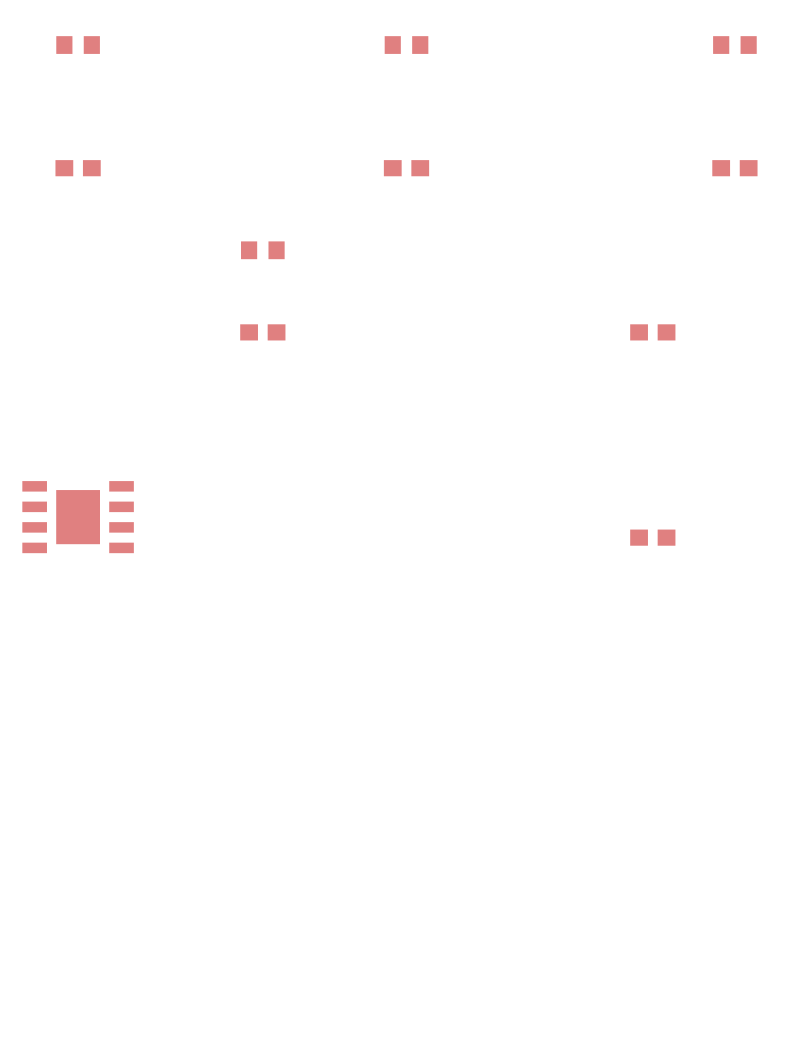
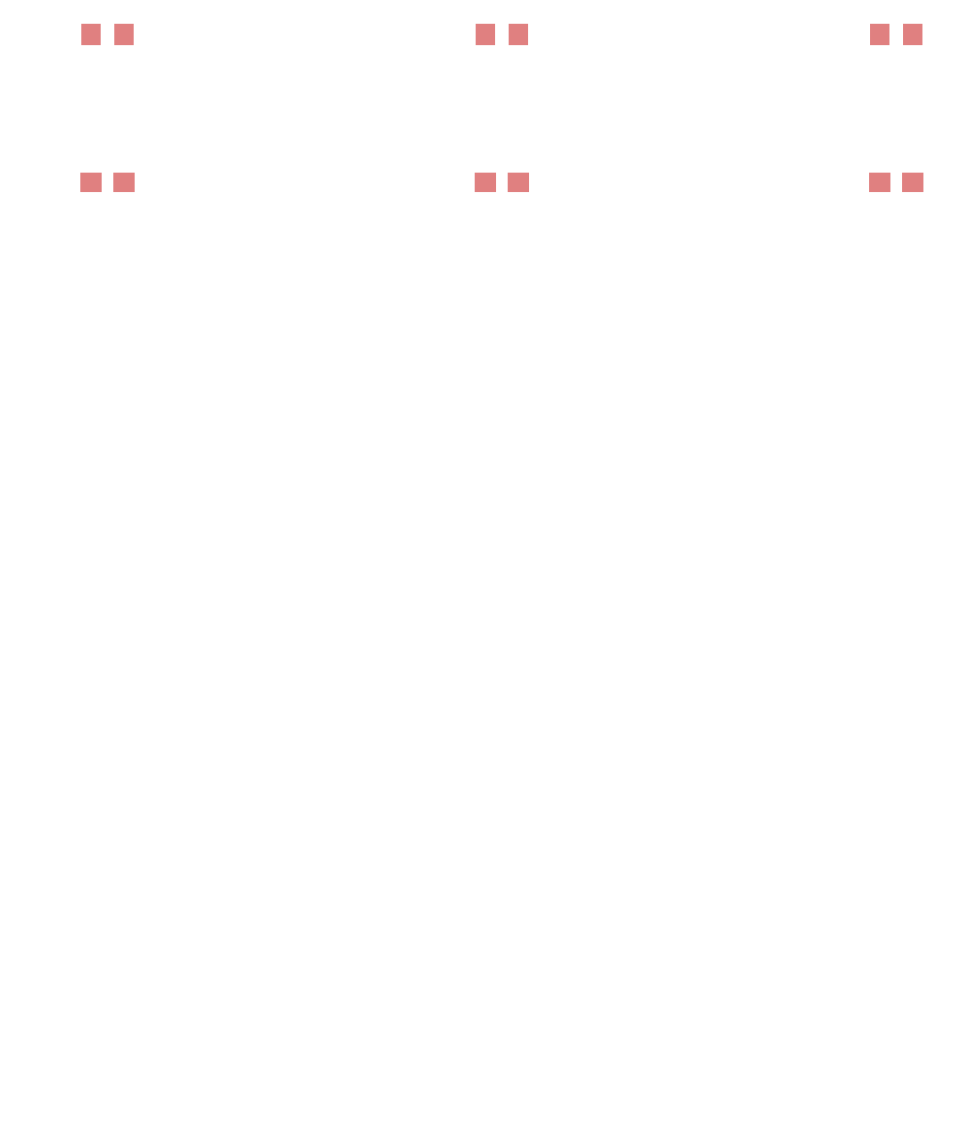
part: (262, 250) -> none
part: (262, 332) -> none
part: (652, 332) -> none
part: (78, 517) -> none
part: (652, 537) -> none

